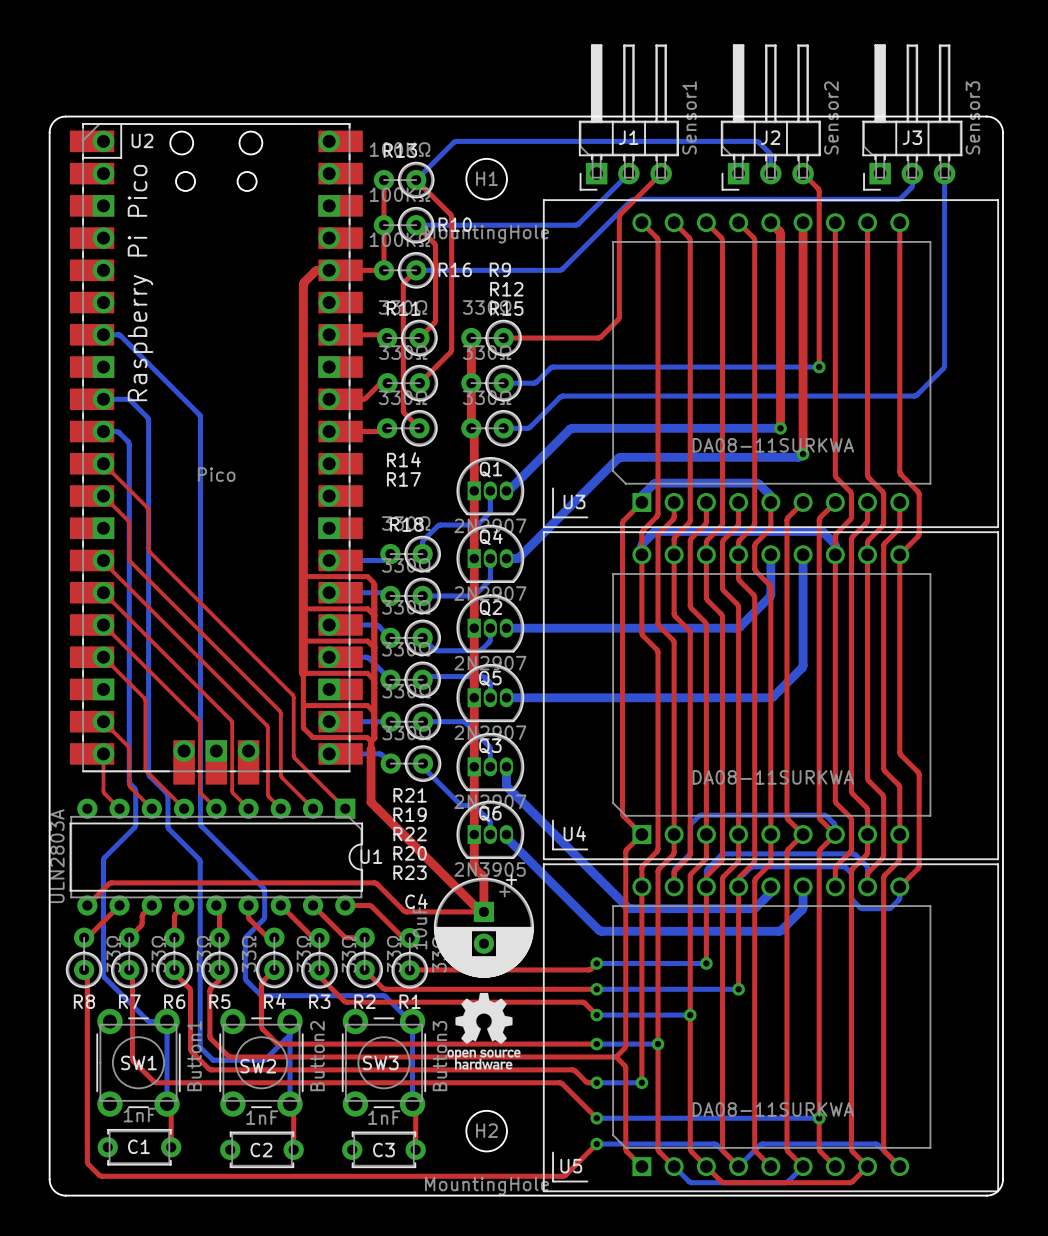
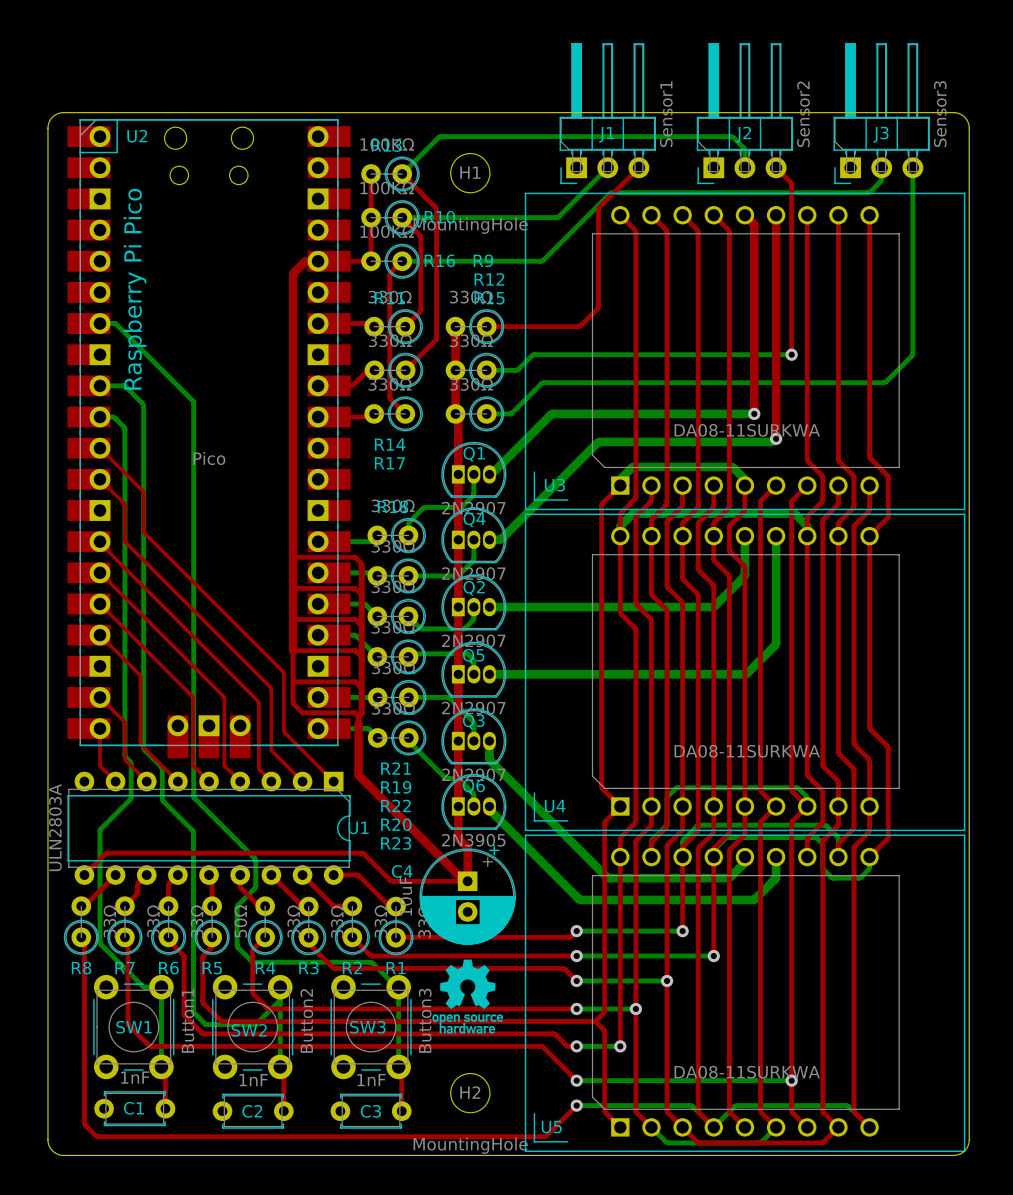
R5 value: 33Ω (249, 954) -> 50Ω (240, 921)

